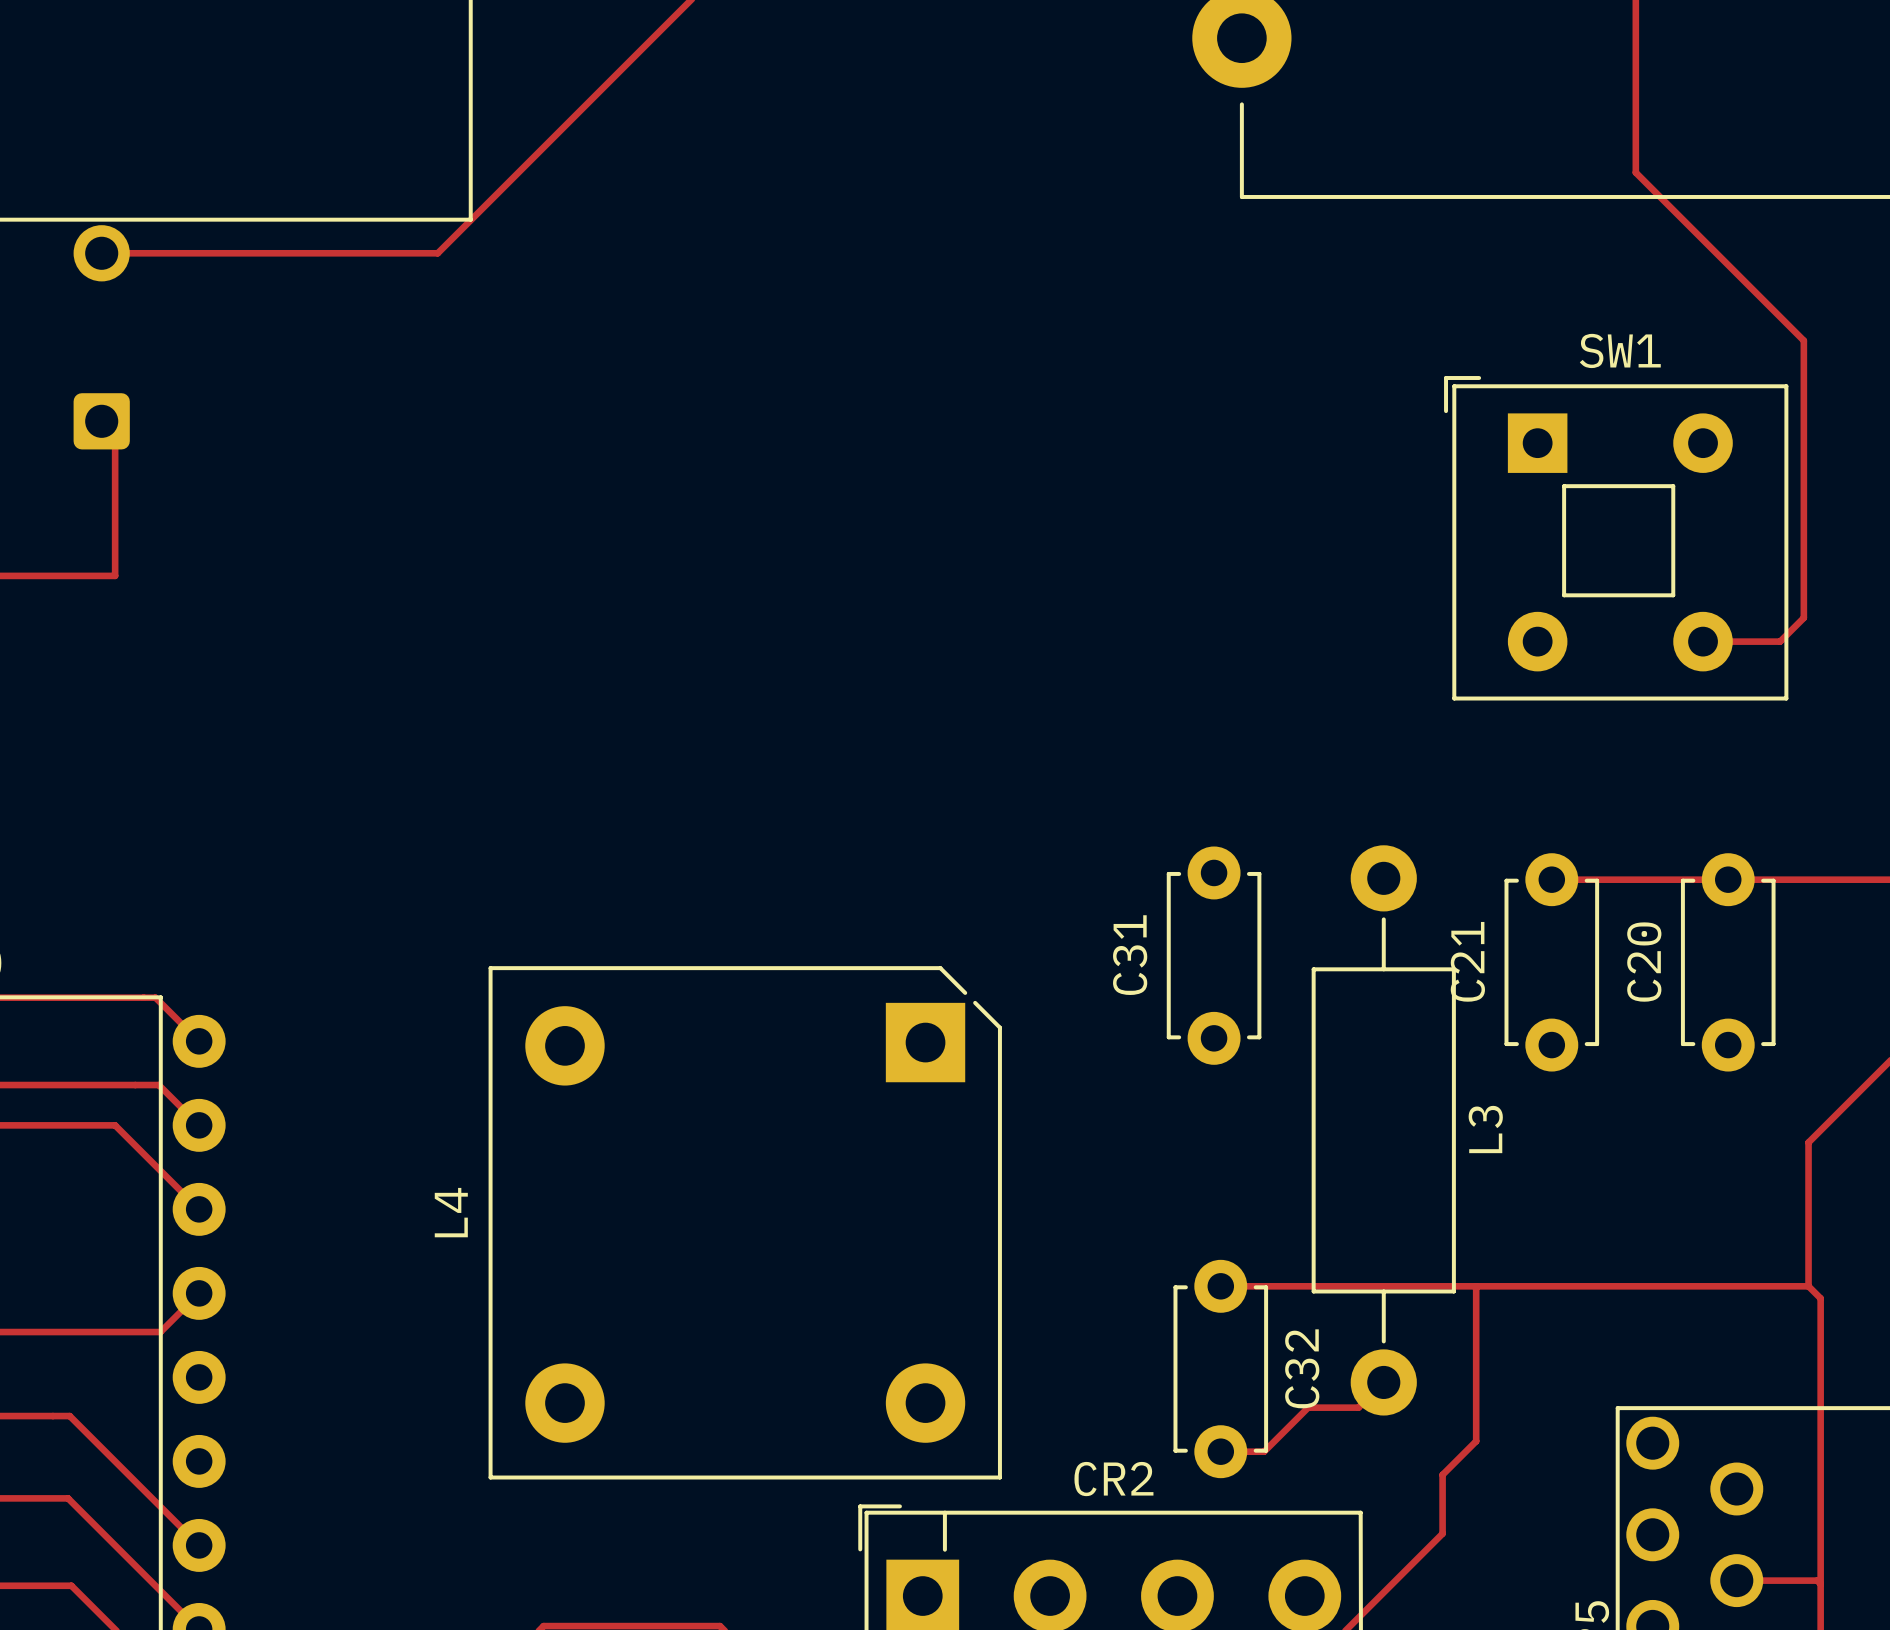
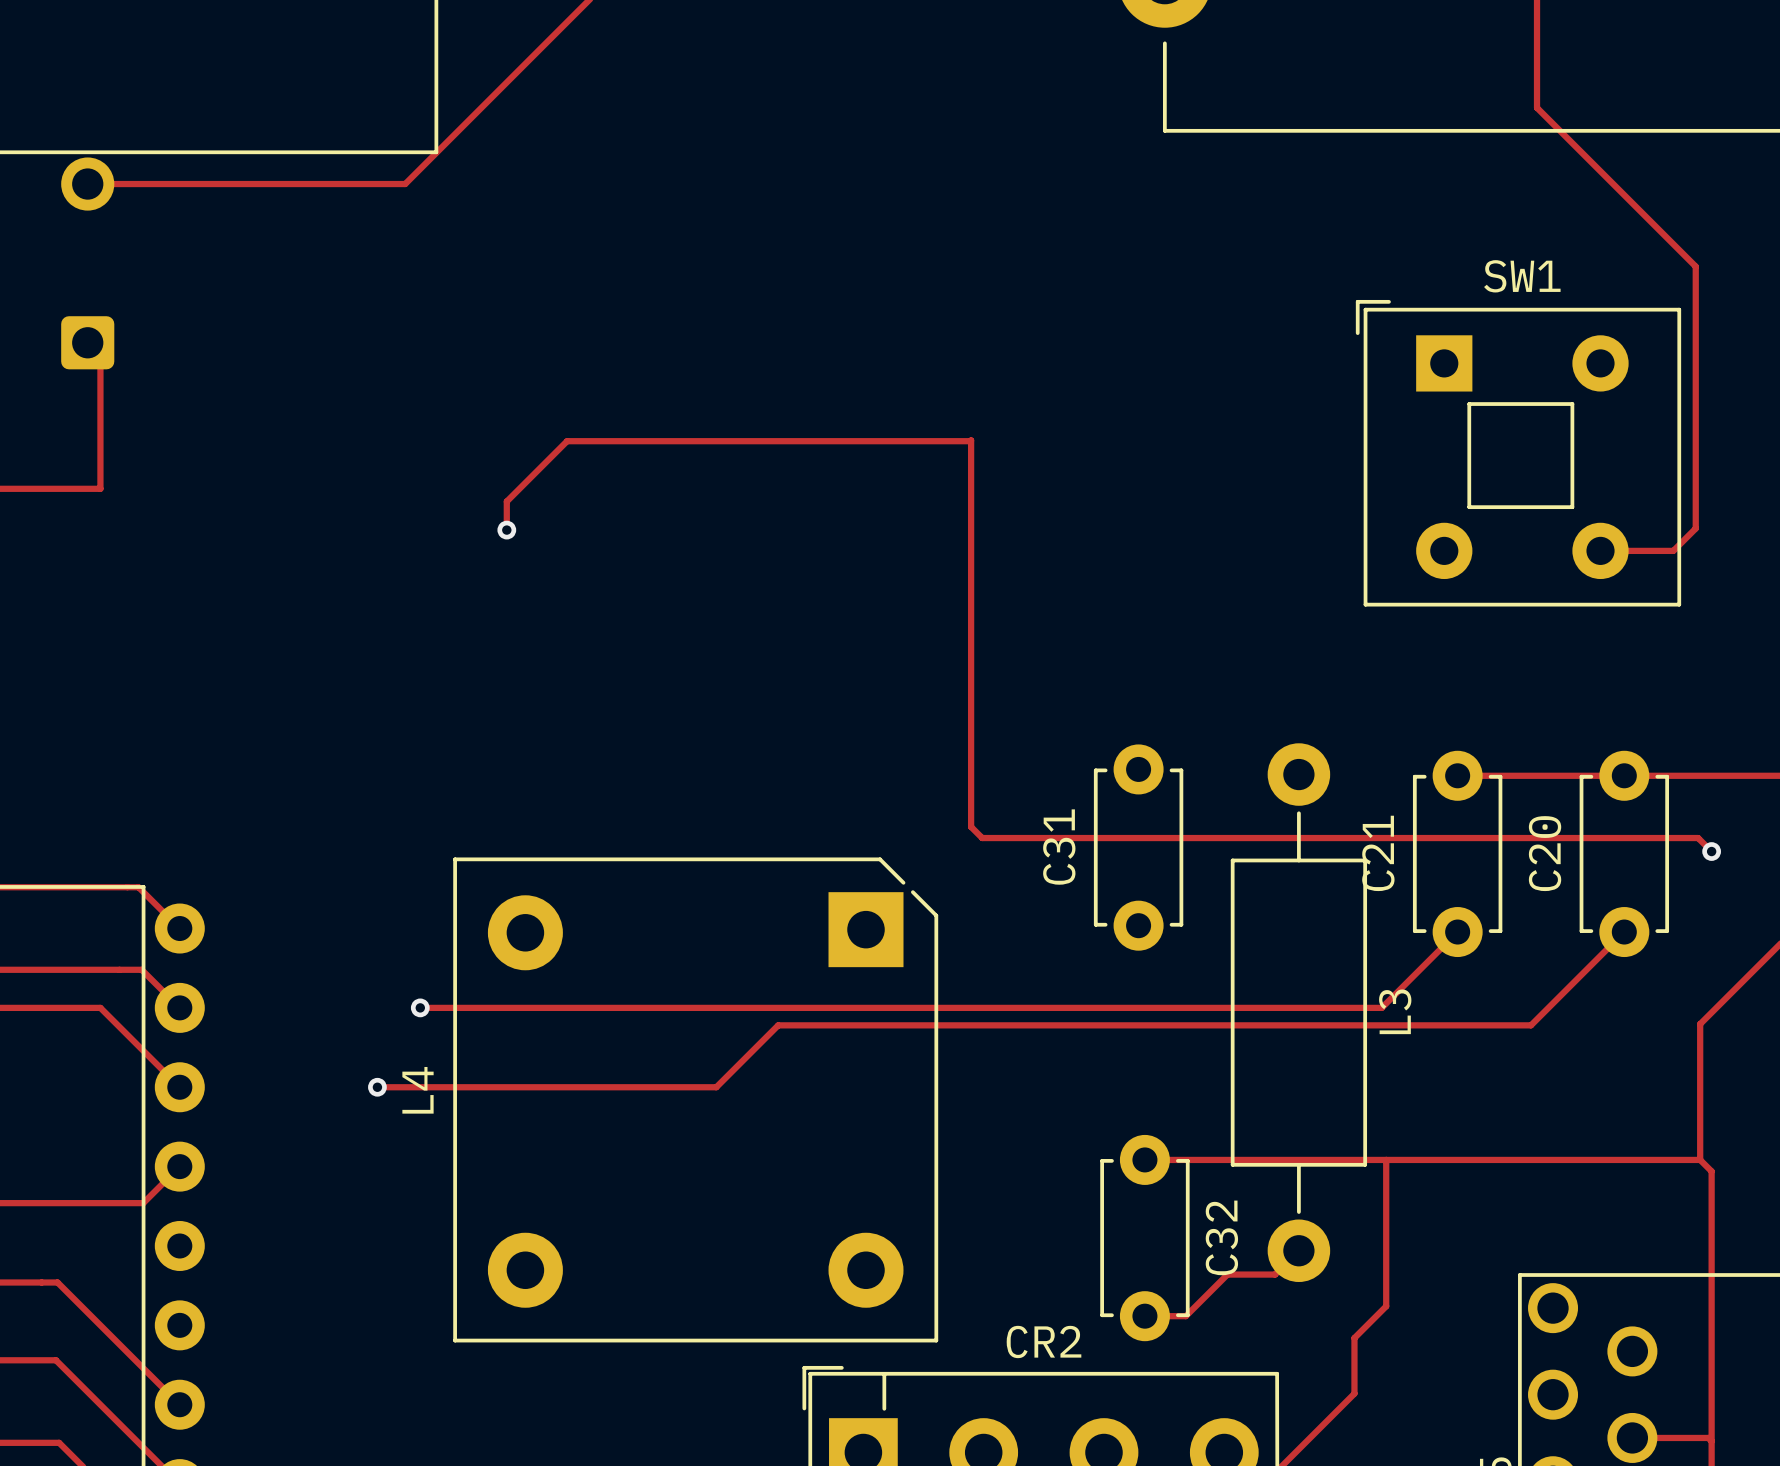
track: none -> (506, 530) (506, 501) (567, 441) (971, 440) (971, 826) (982, 838) (1698, 838) (1711, 851)
via: none -> (506, 530)
via: none -> (1711, 851)
track: none -> (1457, 932) (1381, 1007) (420, 1007)
track: none -> (1624, 932) (1531, 1025) (778, 1025) (716, 1087) (377, 1087)
via: none -> (420, 1007)
via: none -> (377, 1087)

